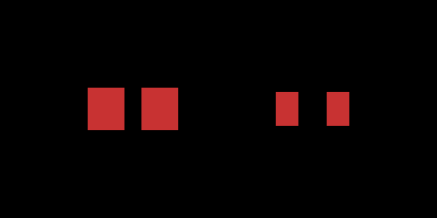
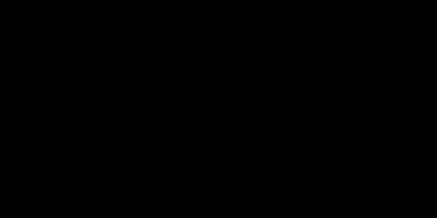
part: (132, 108) -> none
part: (312, 108) -> none

